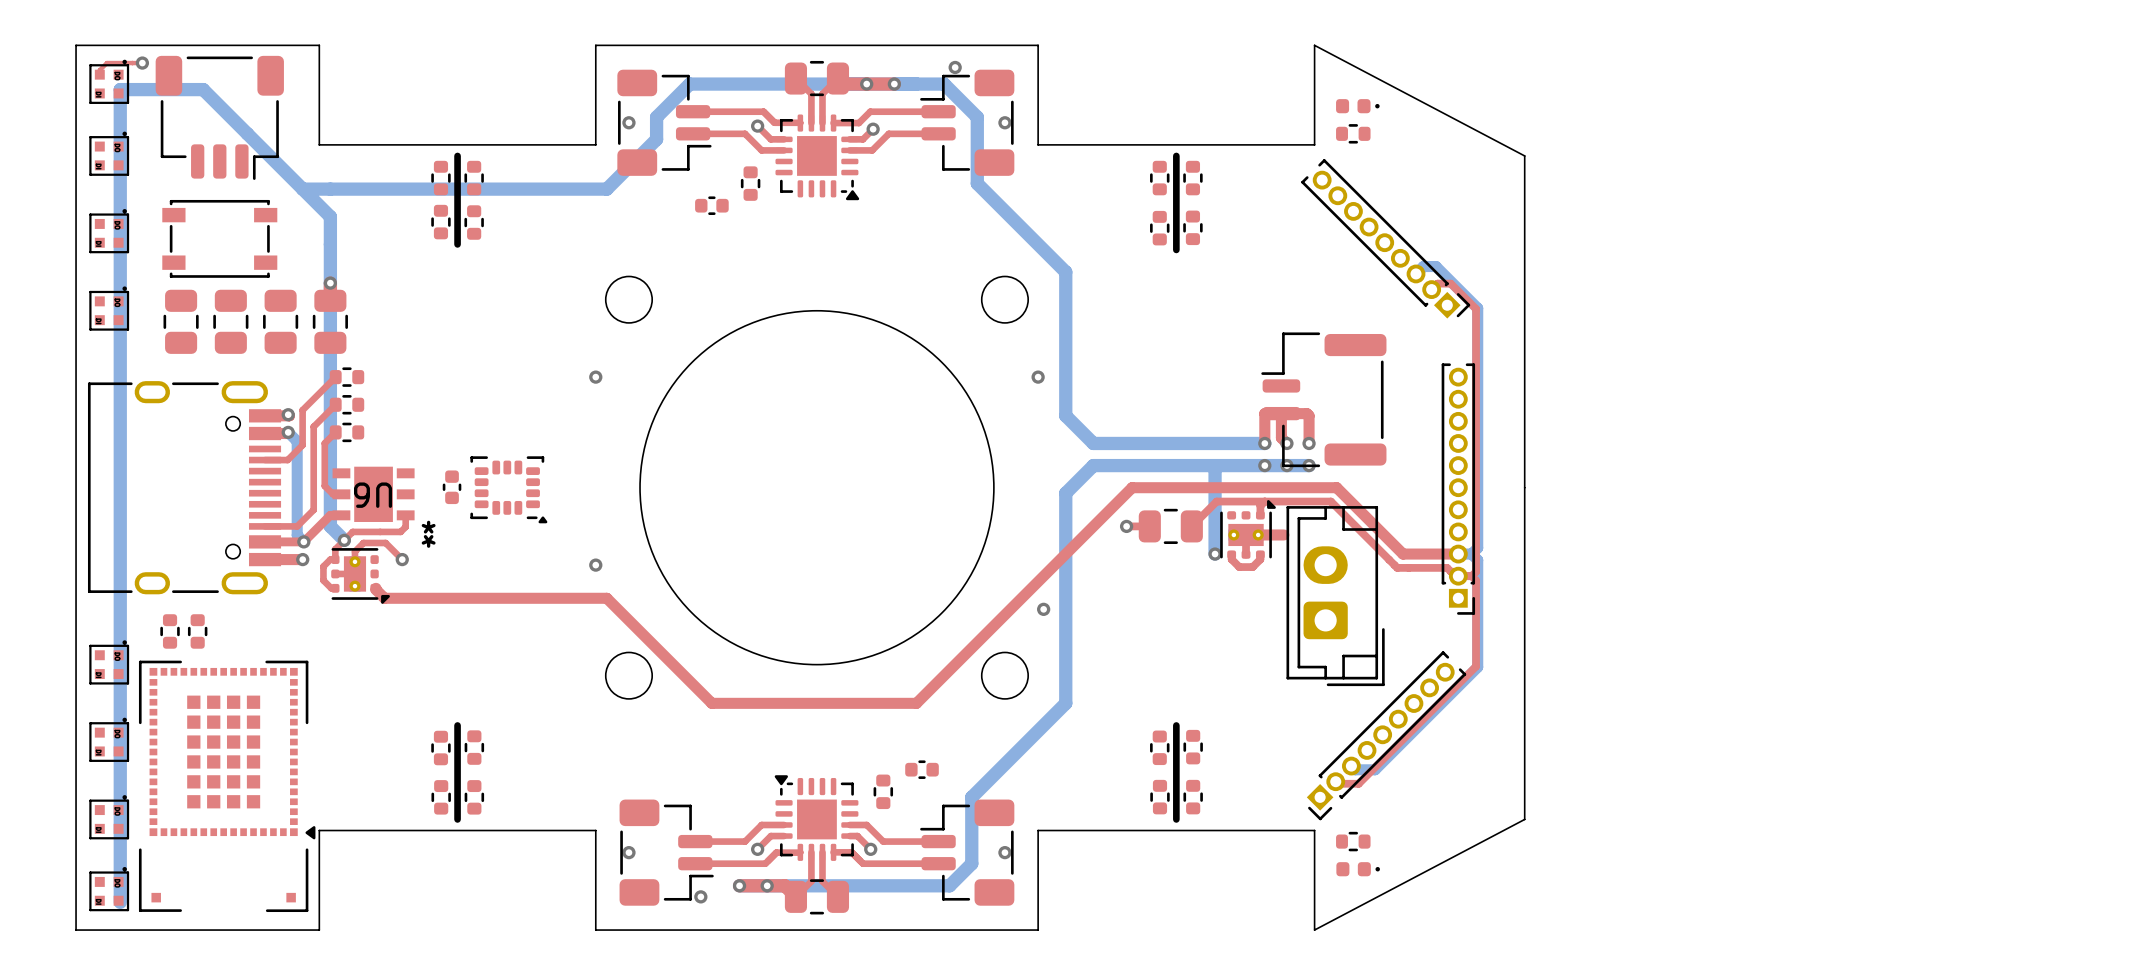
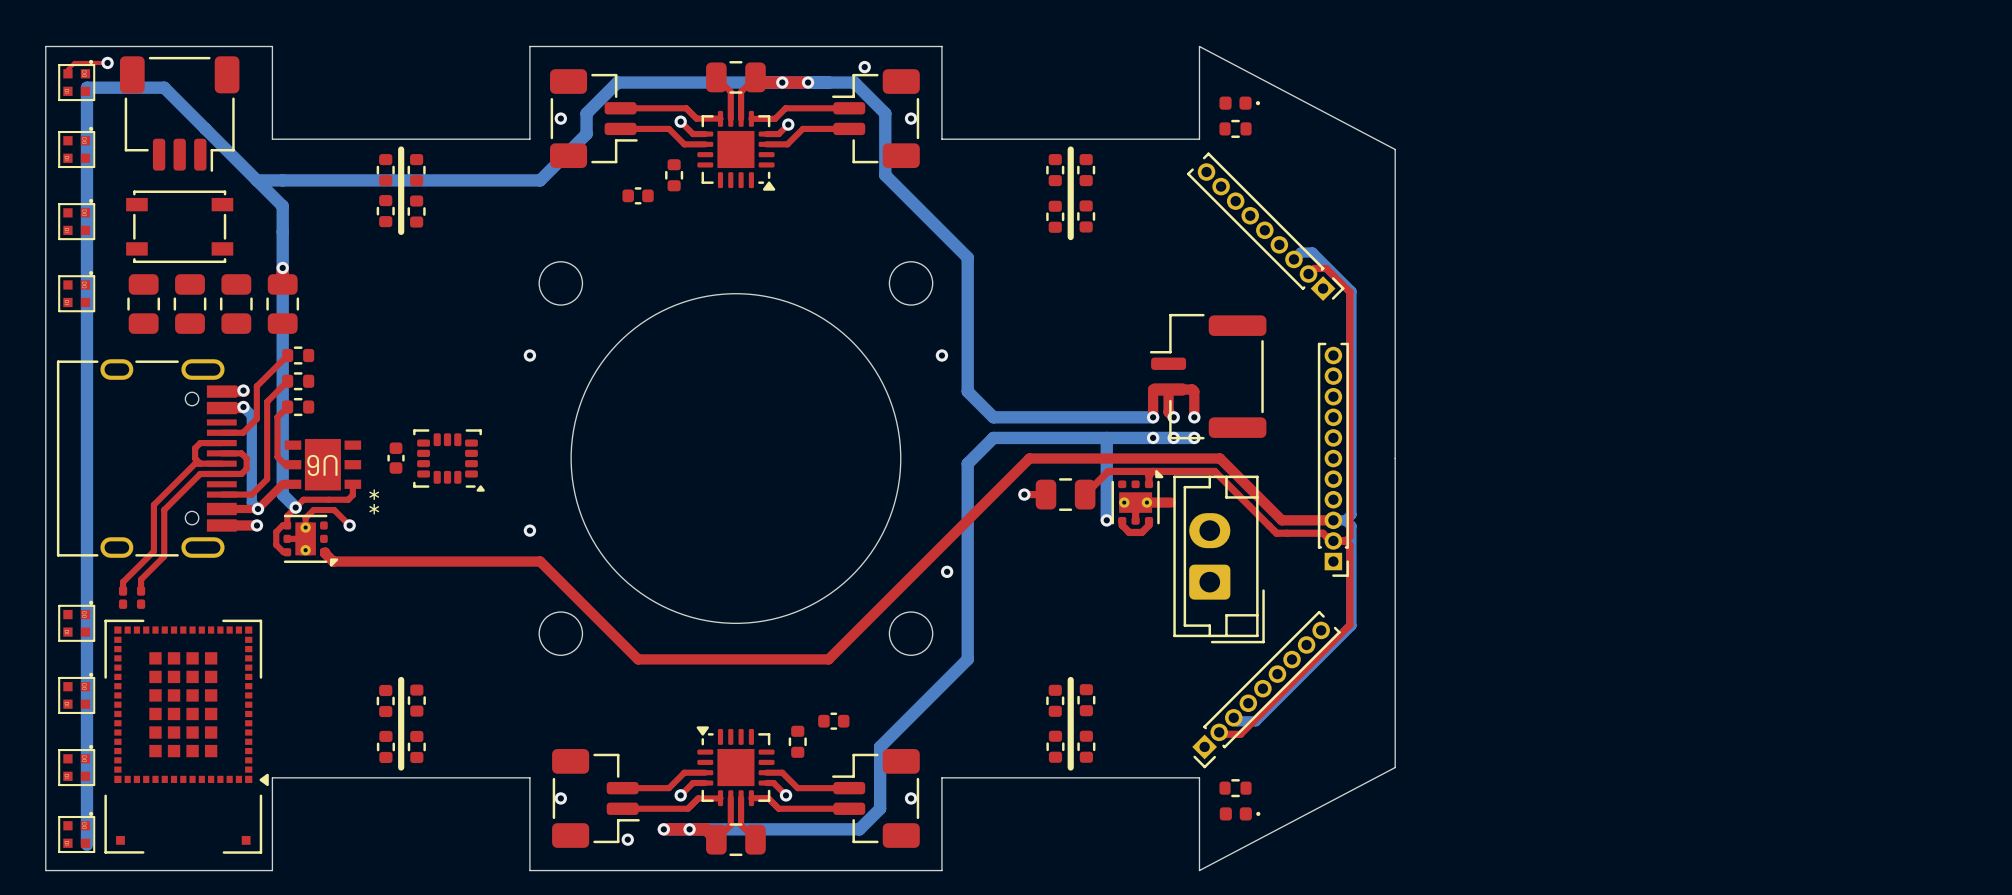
top track: none -> (221, 443) (200, 443) (195, 448) (195, 458) (200, 463)
top track: none -> (221, 453) (241, 453) (246, 458) (246, 468) (241, 473) (200, 473) (164, 510) (164, 556) (141, 579) (141, 590)
top track: none -> (221, 463) (195, 463) (153, 504) (153, 551) (123, 582) (123, 590)
part: (170, 631) -> none
part: (197, 631) -> none
part: none -> (123, 597)
part: none -> (141, 597)

